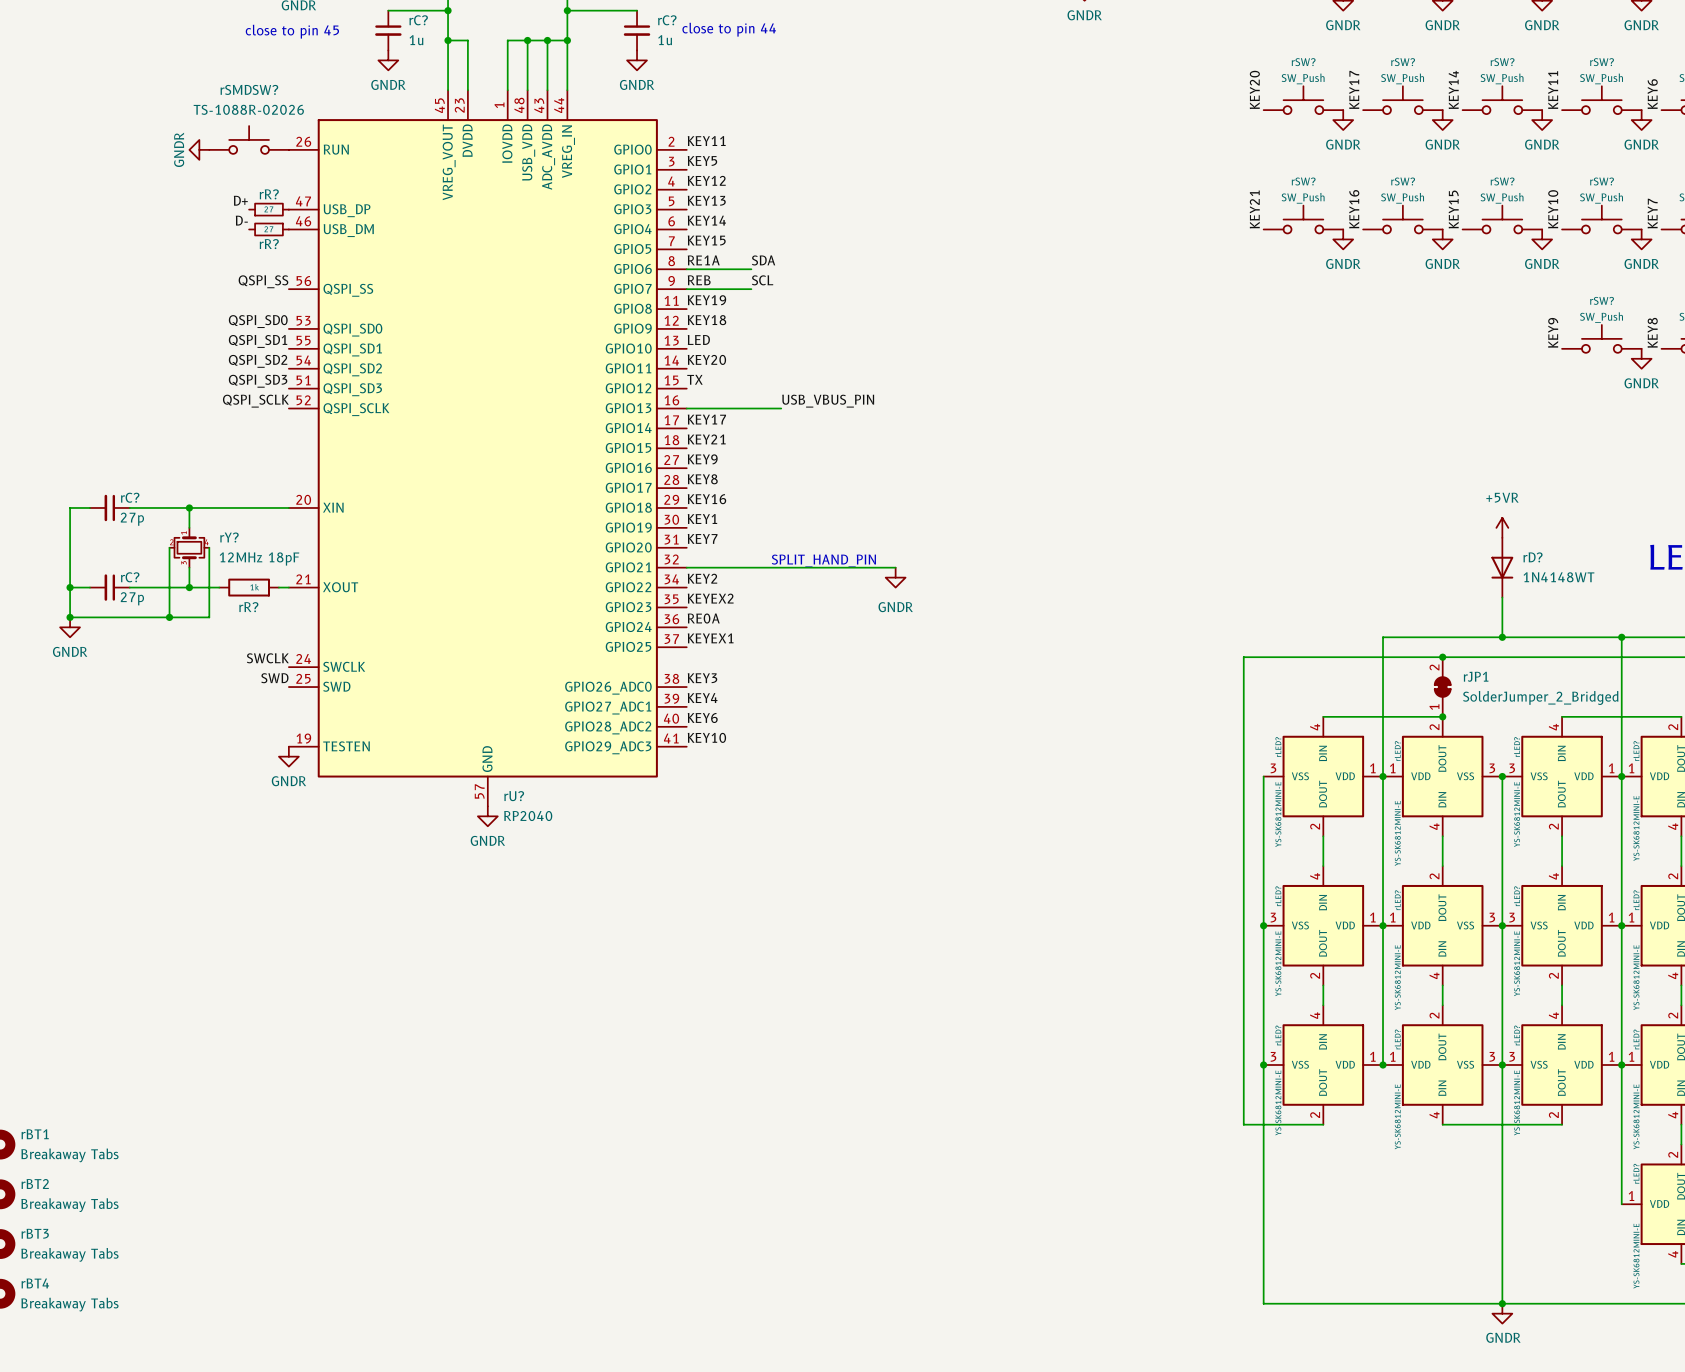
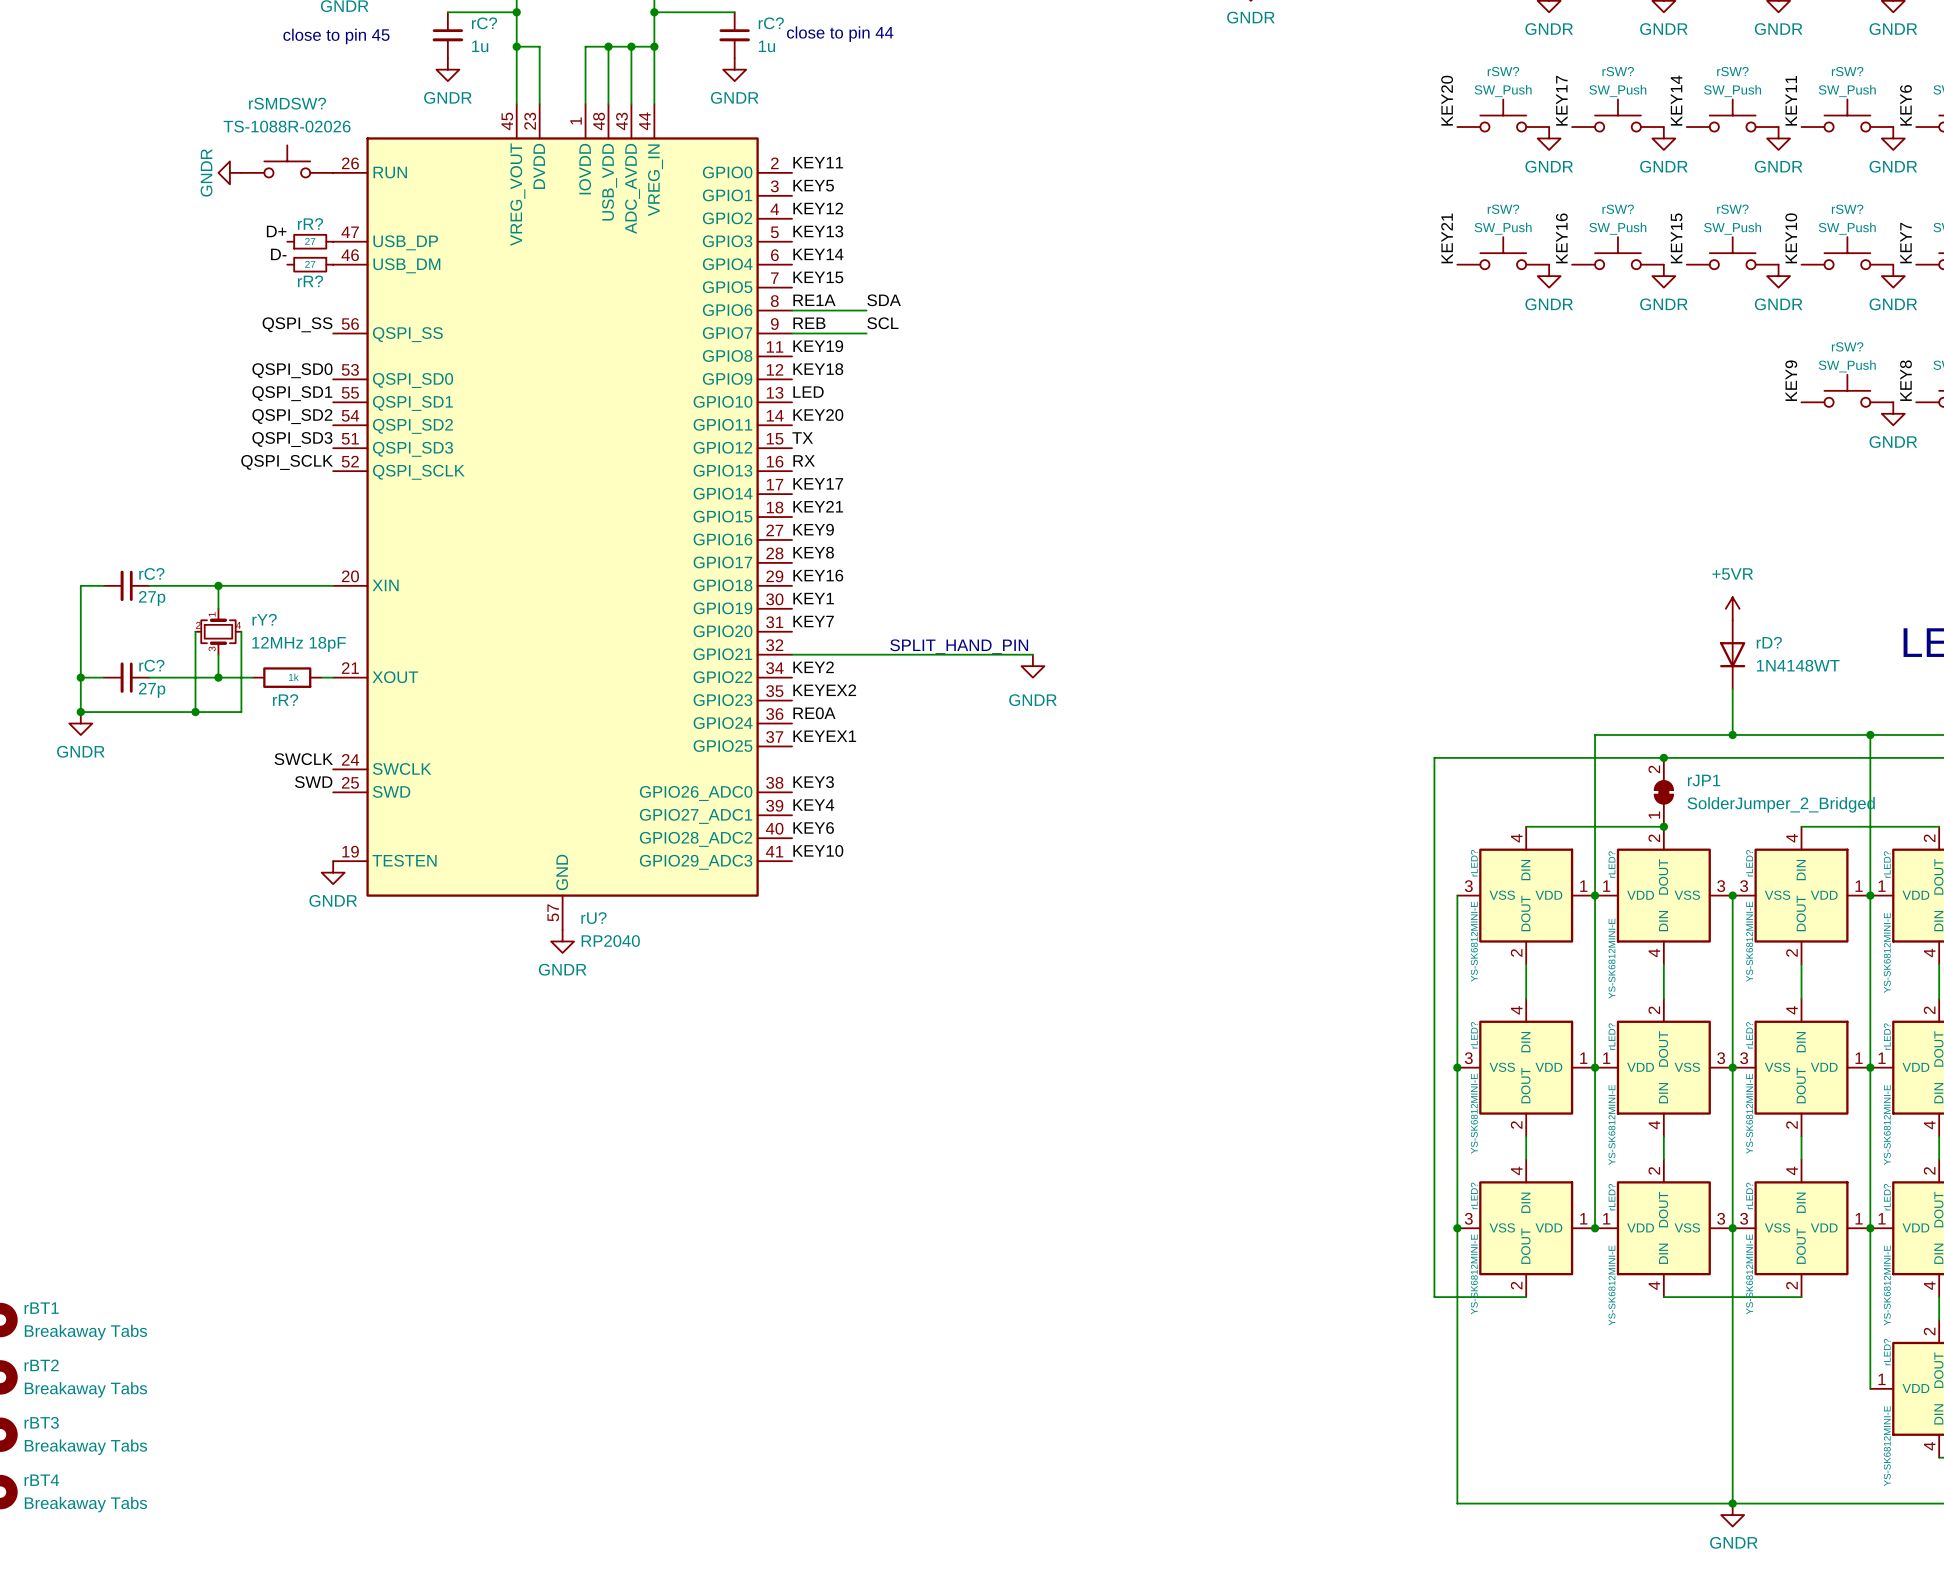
label: none -> RX (804, 460)
label: USB_VBUS_PIN (828, 401) -> none
wire: (686, 408) (781, 408) -> none

